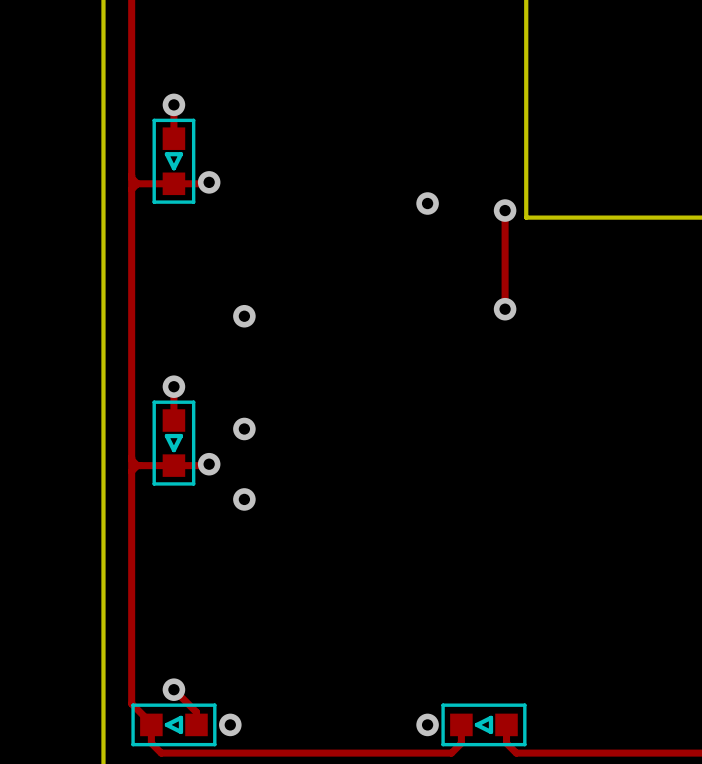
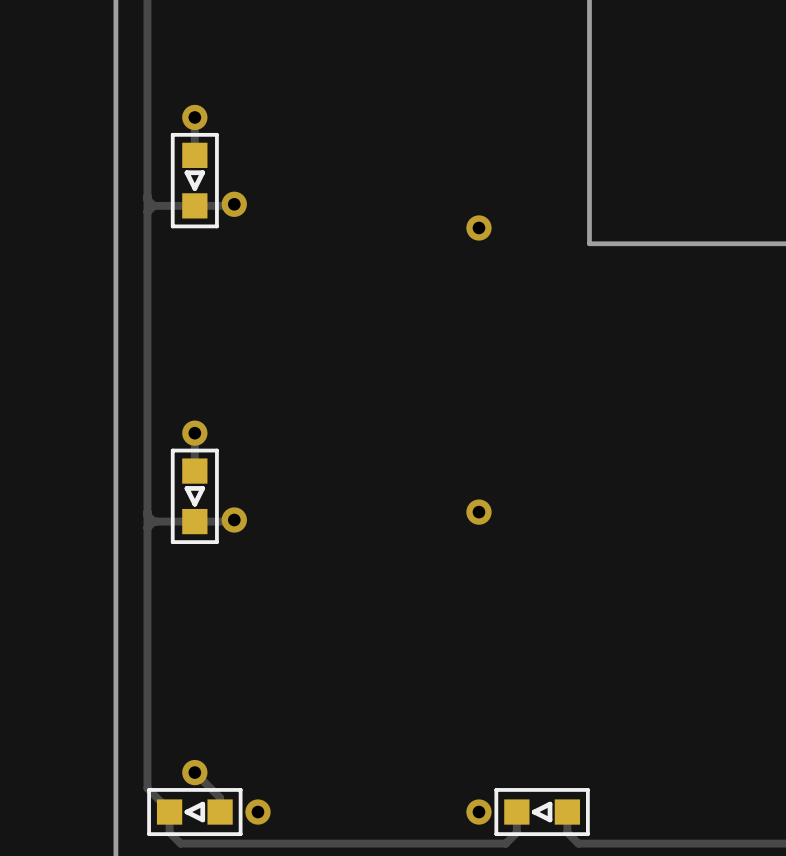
track: (505, 210) (505, 309) -> none
via: (505, 210) -> none
via: (505, 309) -> none
via: (244, 316) -> none
via: (244, 428) -> none
via: none -> (478, 512)
via: (244, 499) -> none

